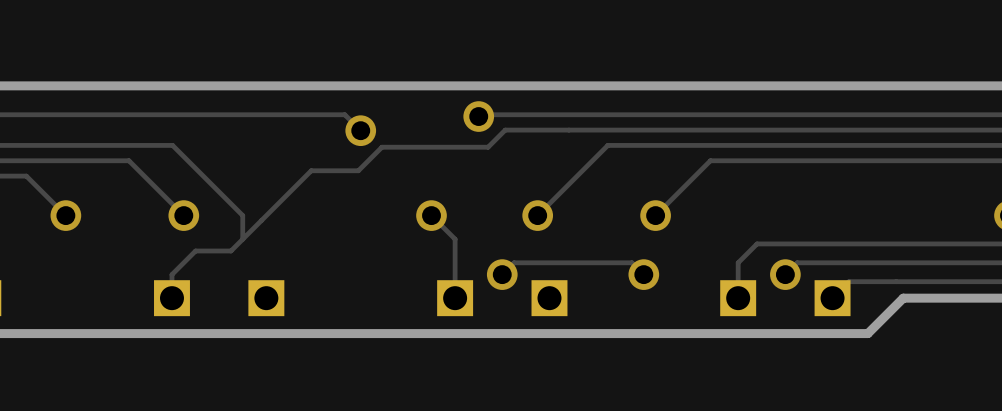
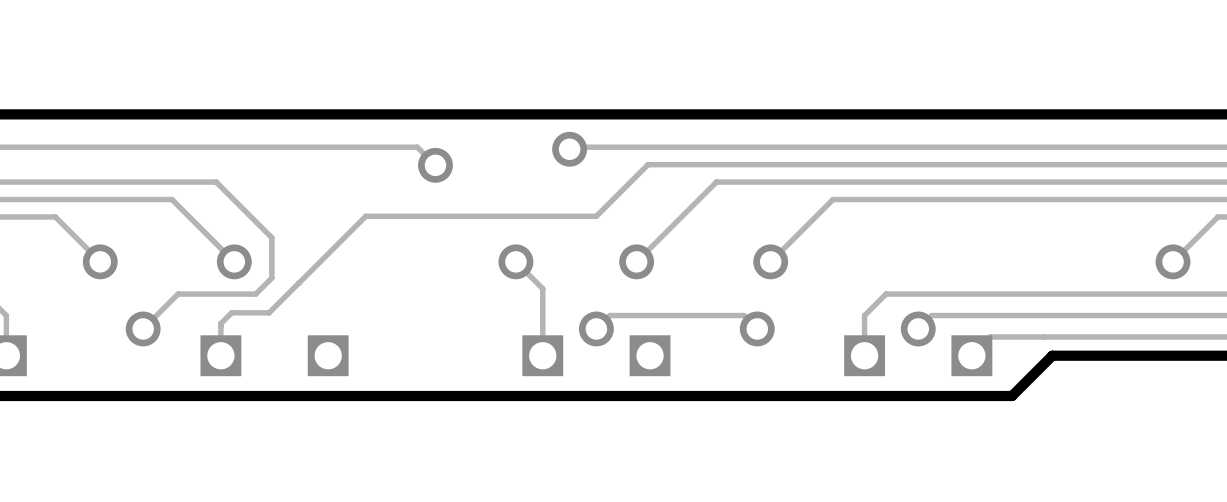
track: (547, 130) (505, 130) (488, 147) (381, 147) (358, 170) (311, 170) (231, 251) (195, 251) (171, 274) -> (648, 164) (596, 216) (365, 216) (269, 312) (231, 312) (220, 323) (220, 328)
track: (167, 145) (172, 145) (242, 215) (242, 239) -> (216, 182) (271, 237) (271, 278) (255, 294) (178, 294) (143, 328)
via: none -> (143, 328)

